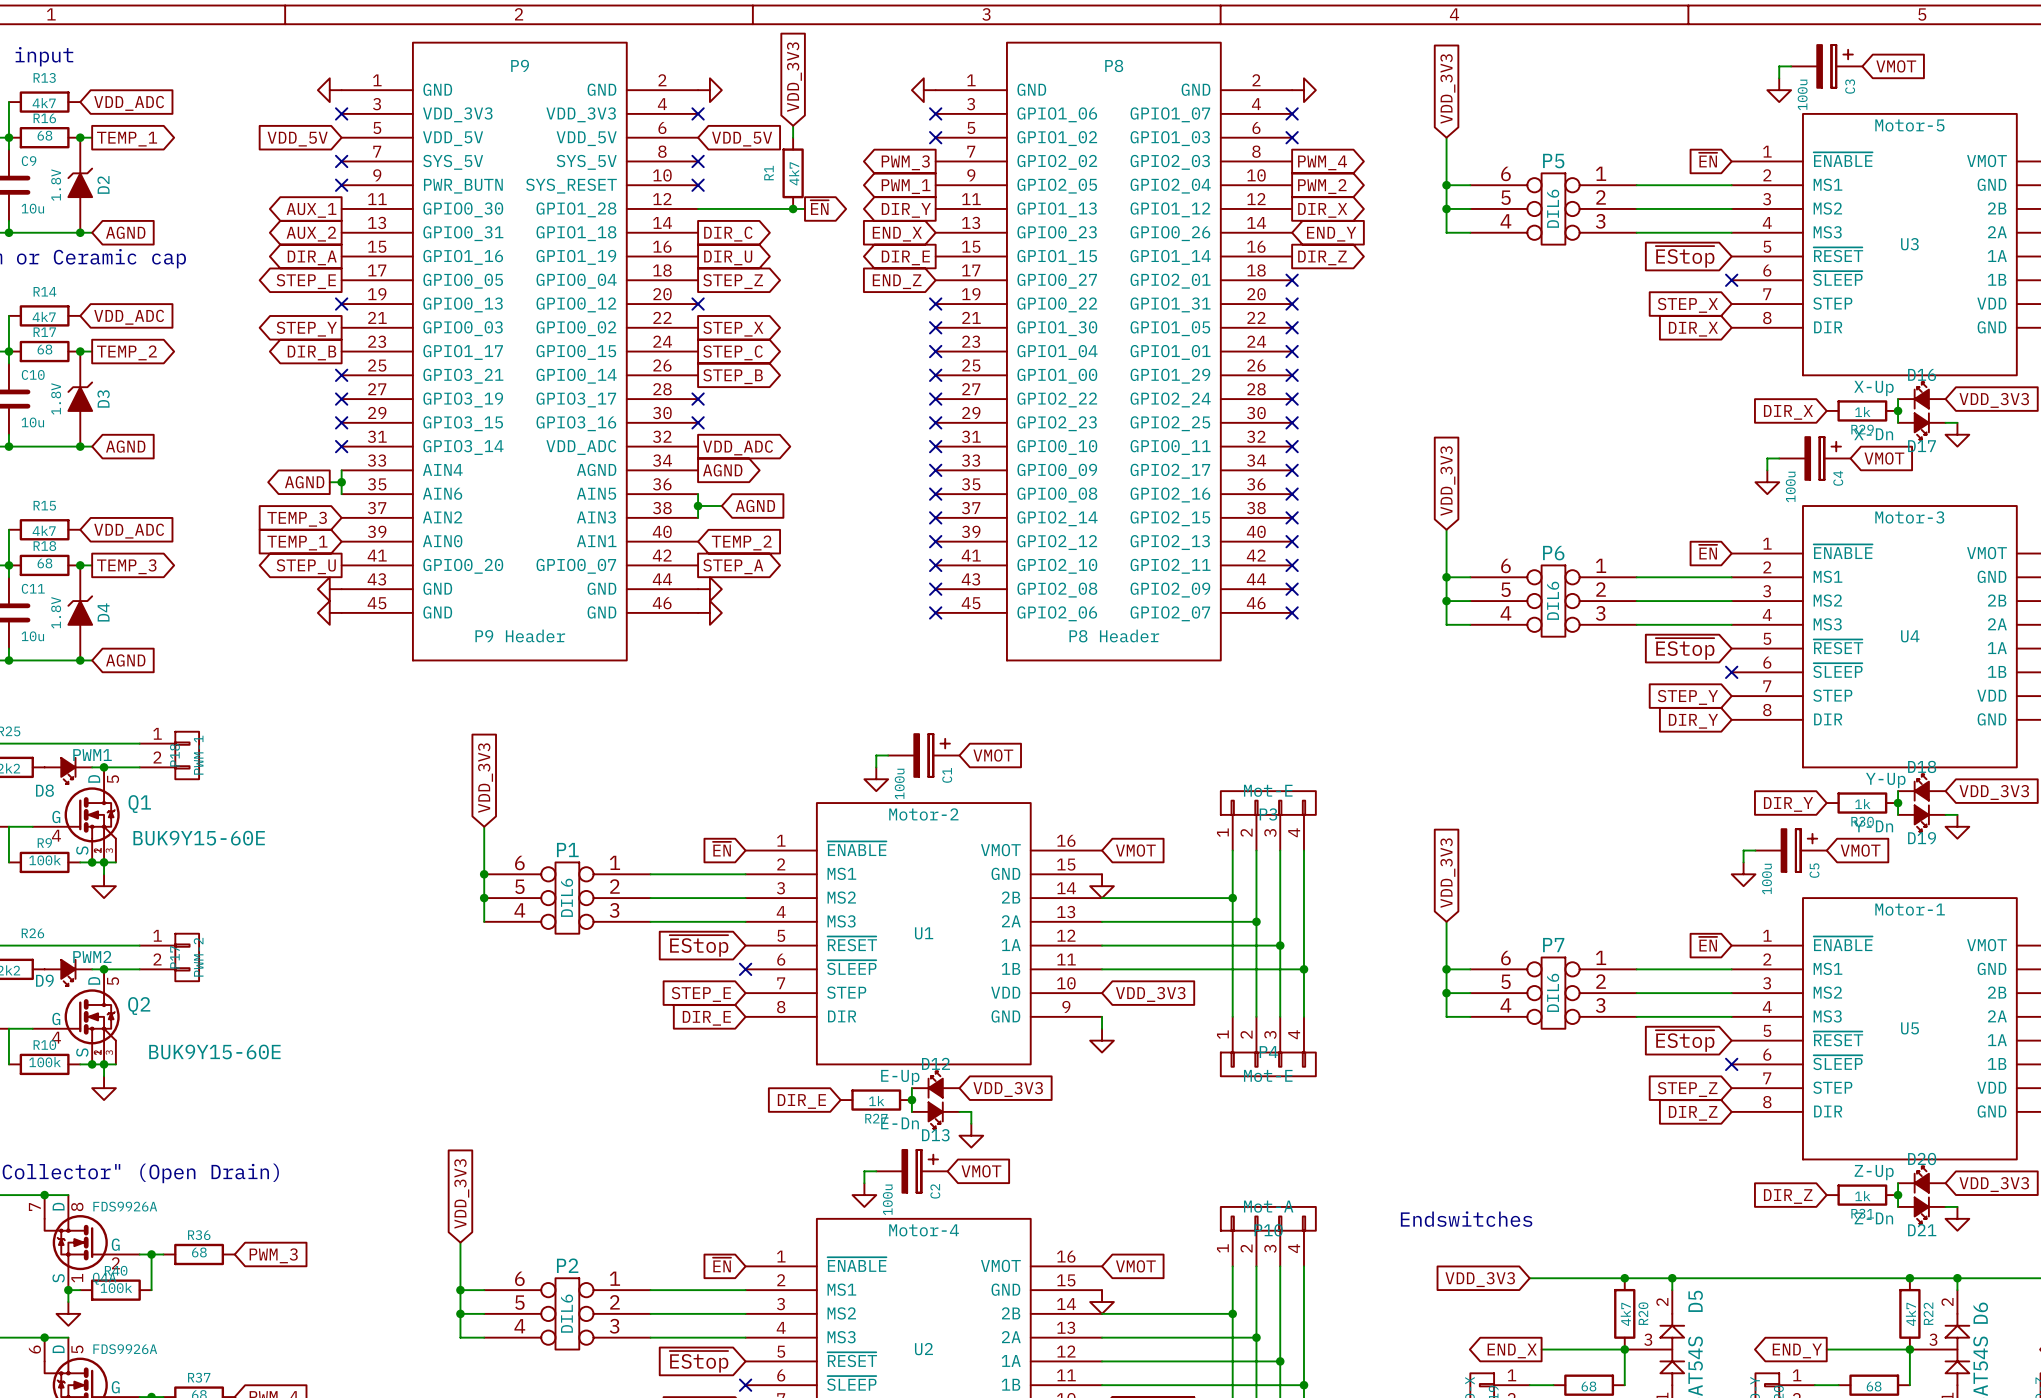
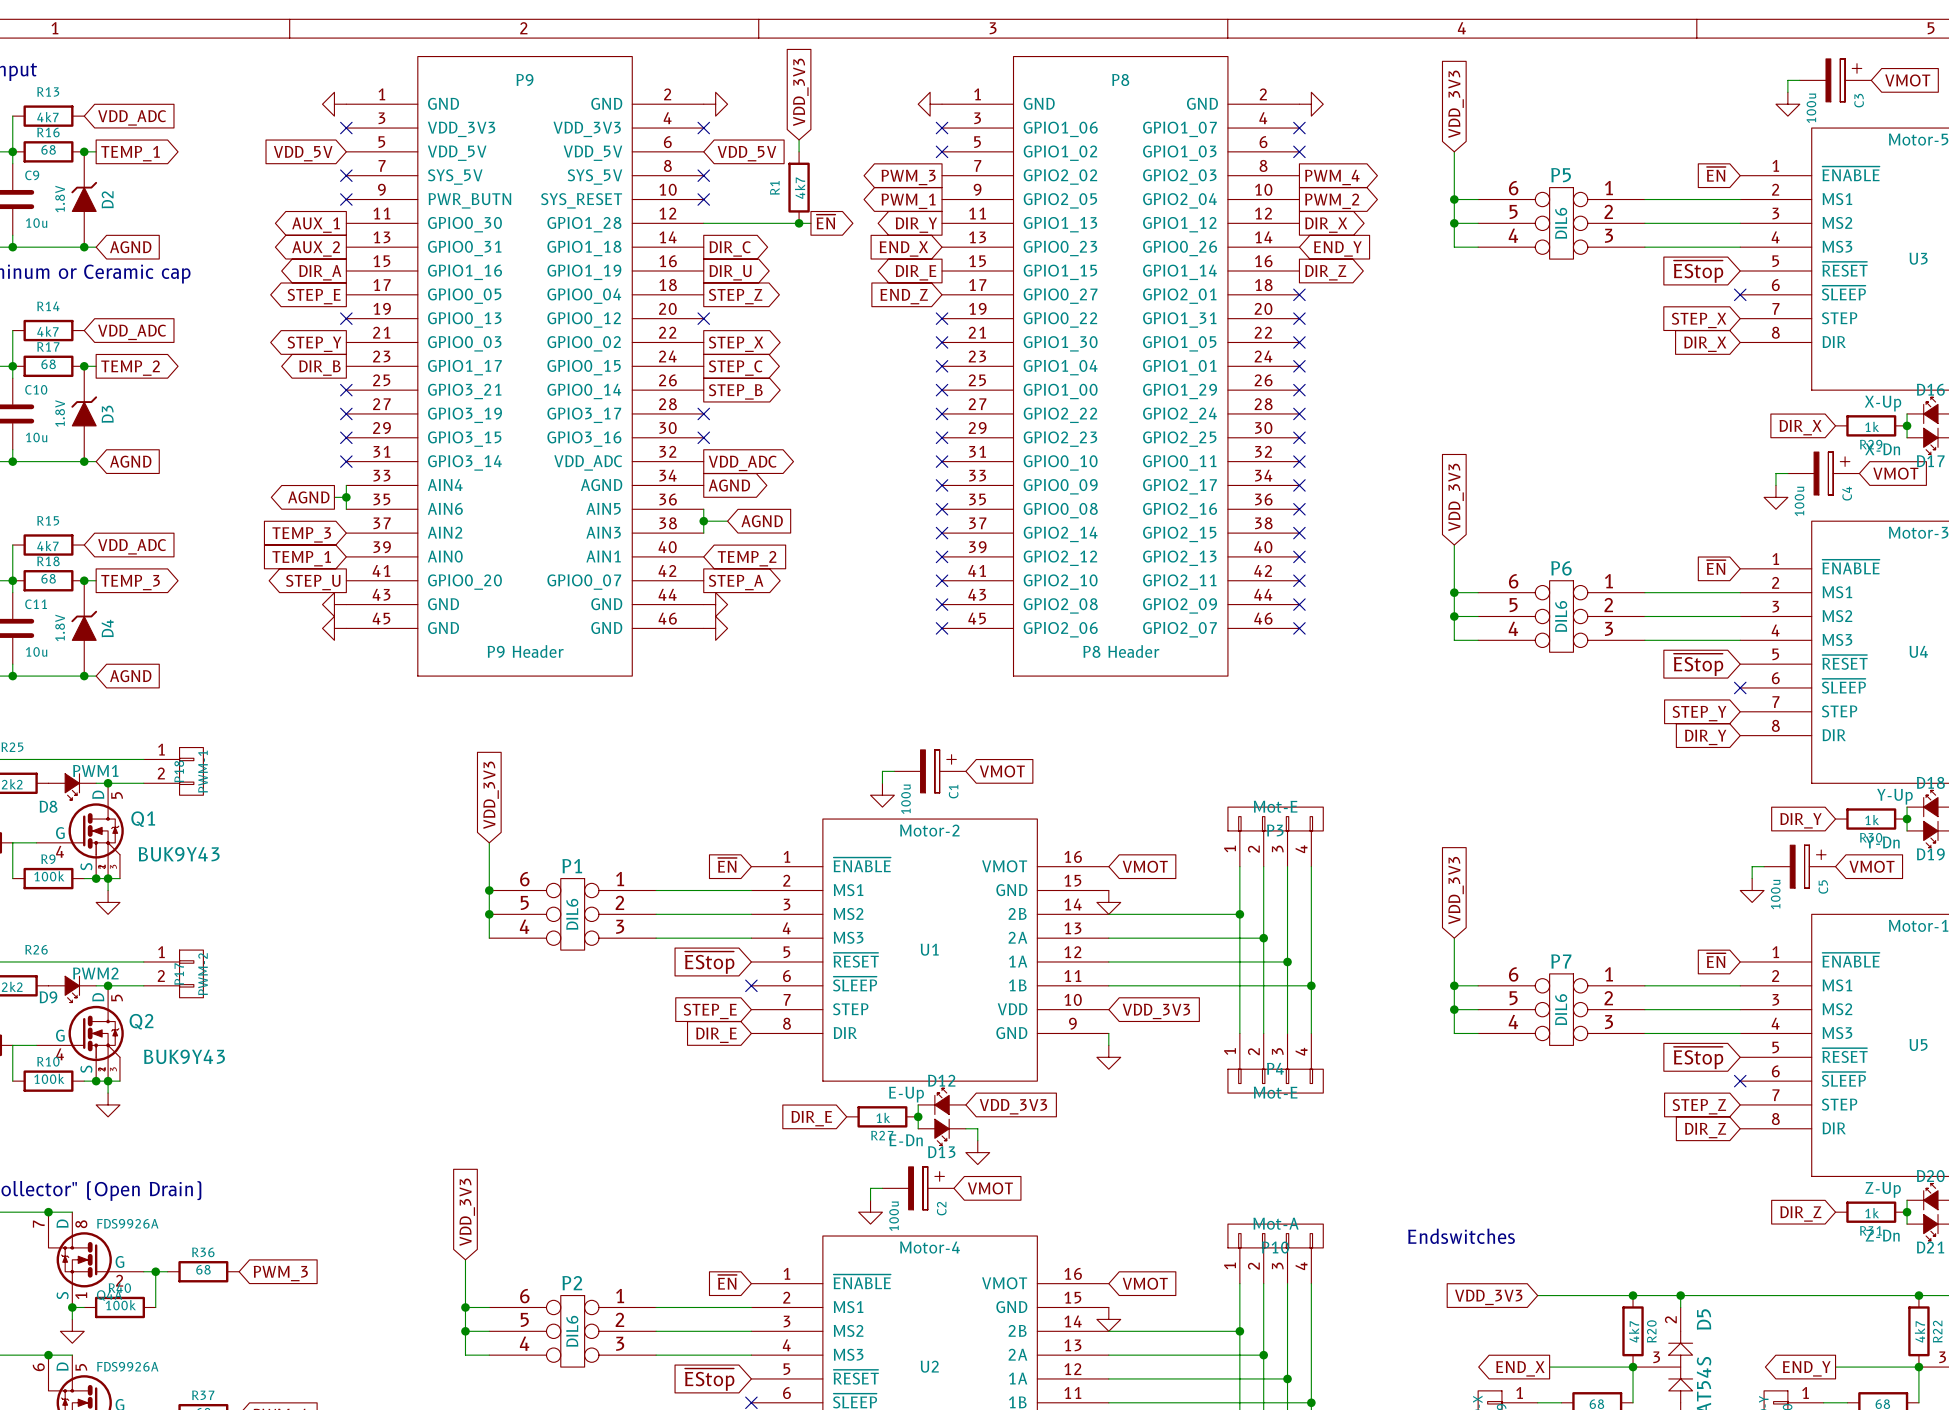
Q1 value: BUK9Y15-60E (199, 838) -> BUK9Y43 (179, 854)
Q2 value: BUK9Y15-60E (214, 1051) -> BUK9Y43 (184, 1056)

